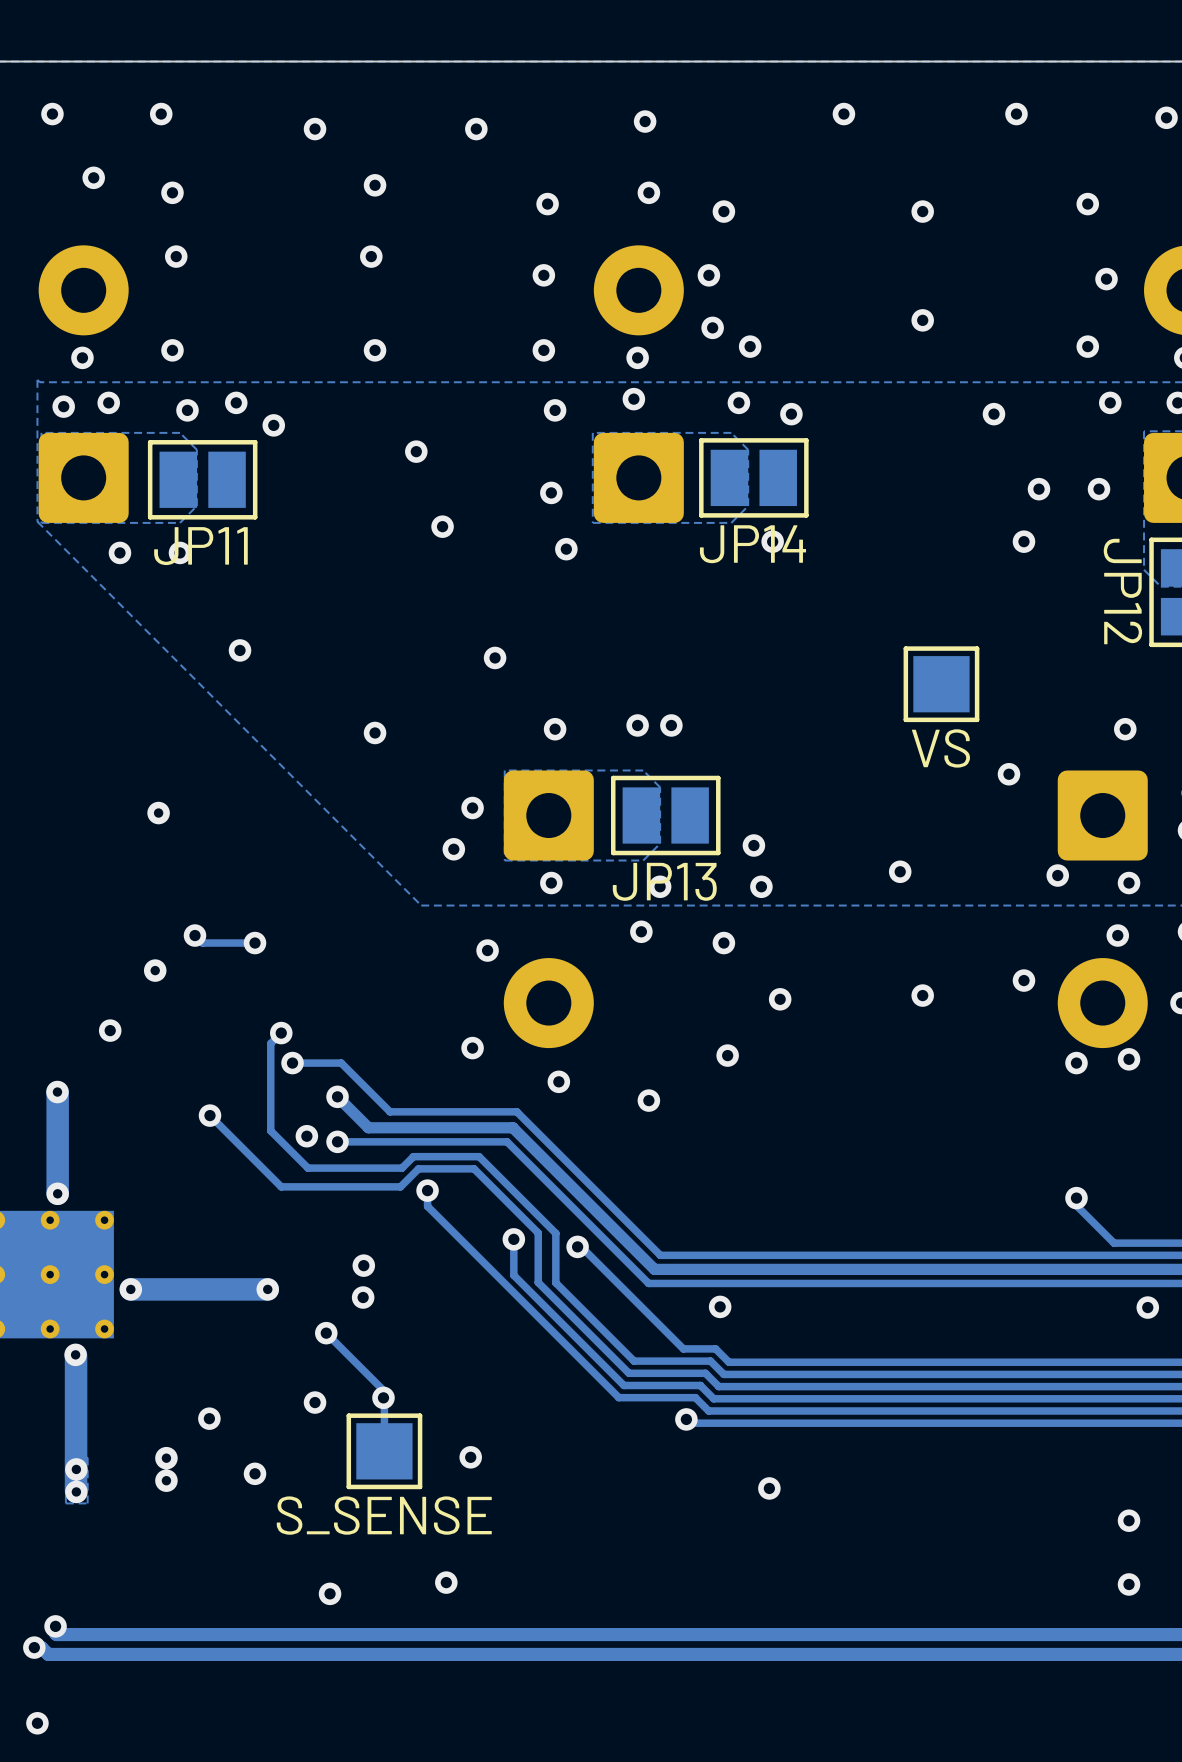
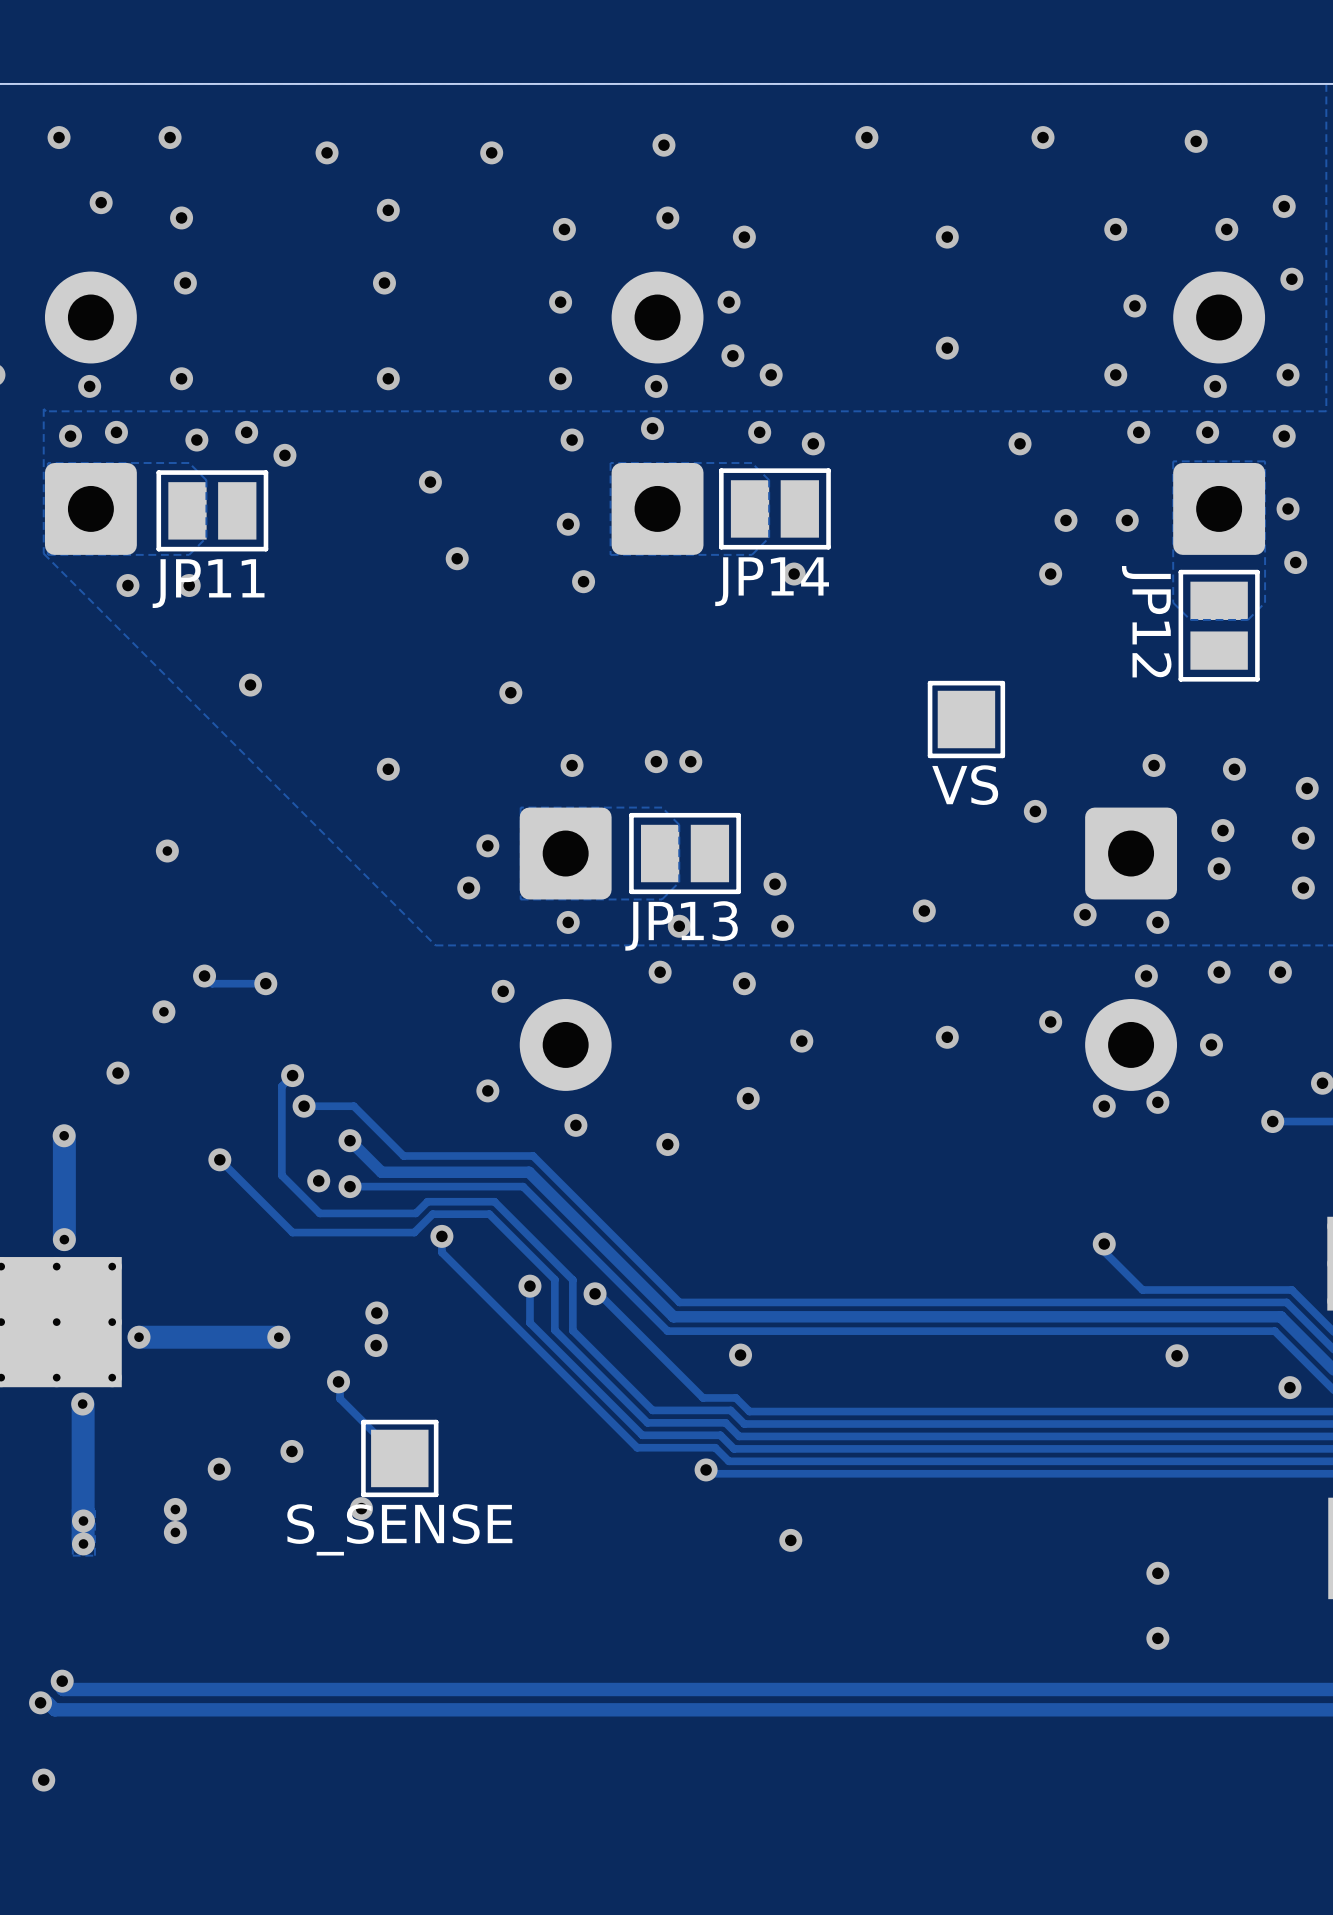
track: (327, 1334) (383, 1390) (384, 1451) -> (340, 1383) (340, 1398) (399, 1458)
via: (383, 1397) -> none
via: none -> (291, 1451)
via: (315, 1402) -> none
part position: (384, 1451) -> (399, 1458)
via: none -> (361, 1508)
via: (470, 1457) -> none
via: (255, 1473) -> none
via: (446, 1582) -> none
via: (330, 1593) -> none

